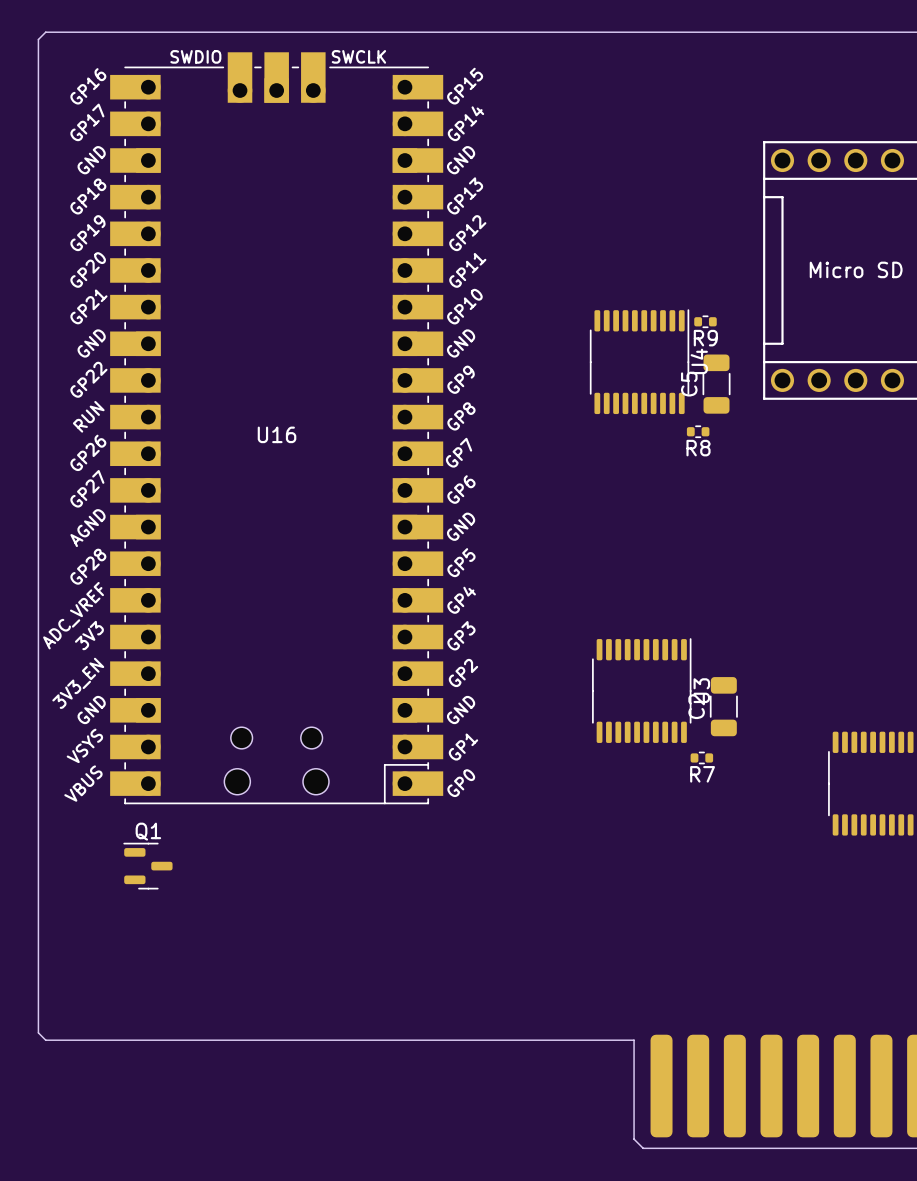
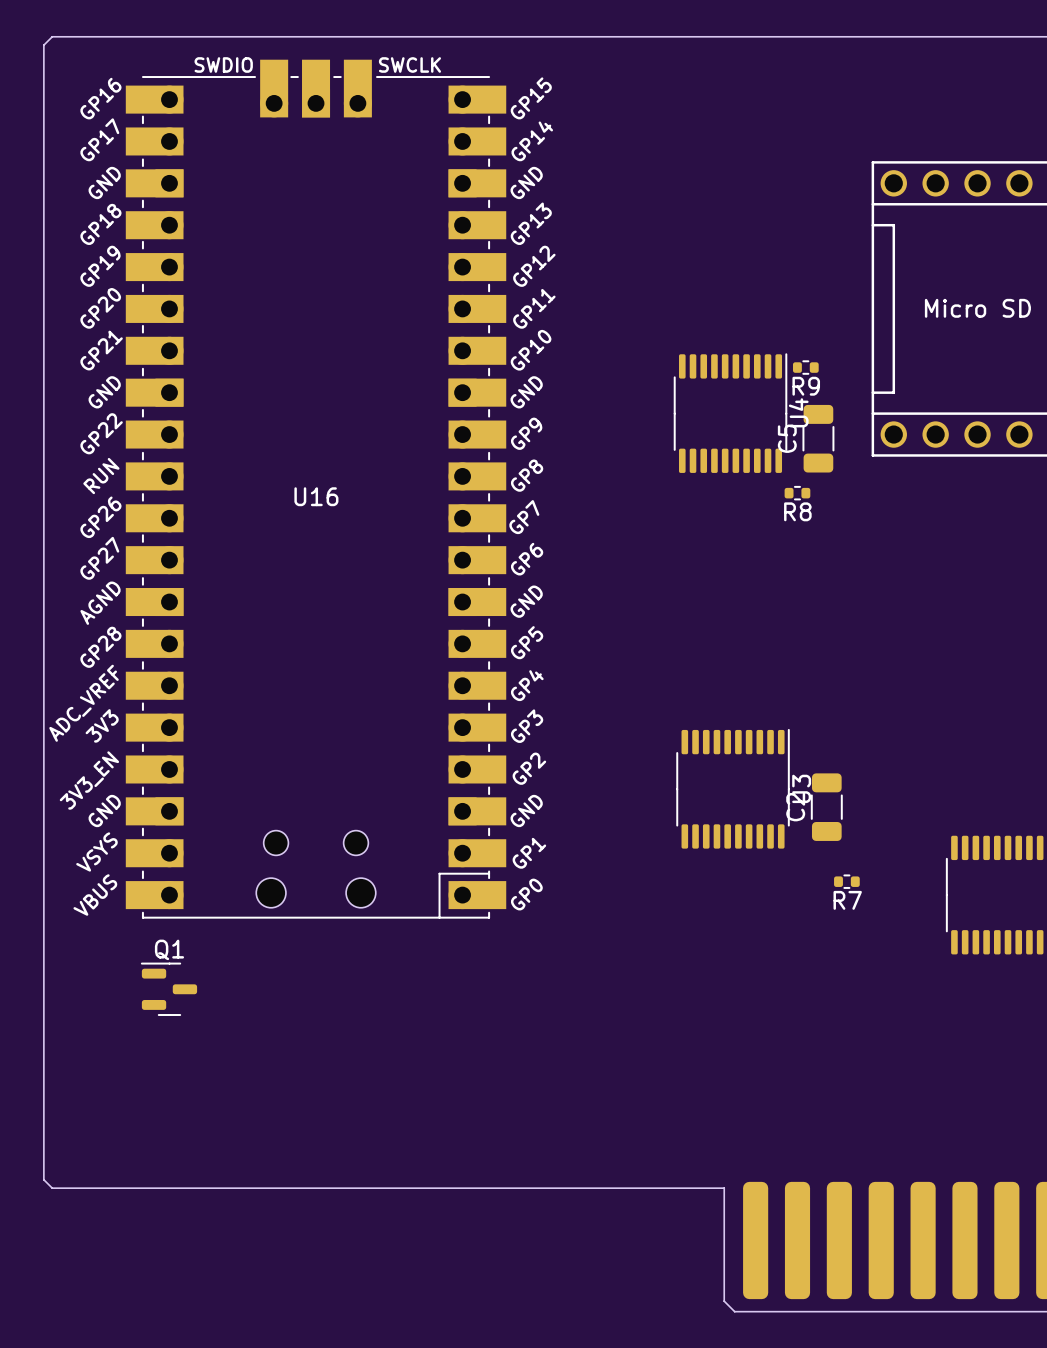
R7 position: (701, 757) -> (846, 881)

